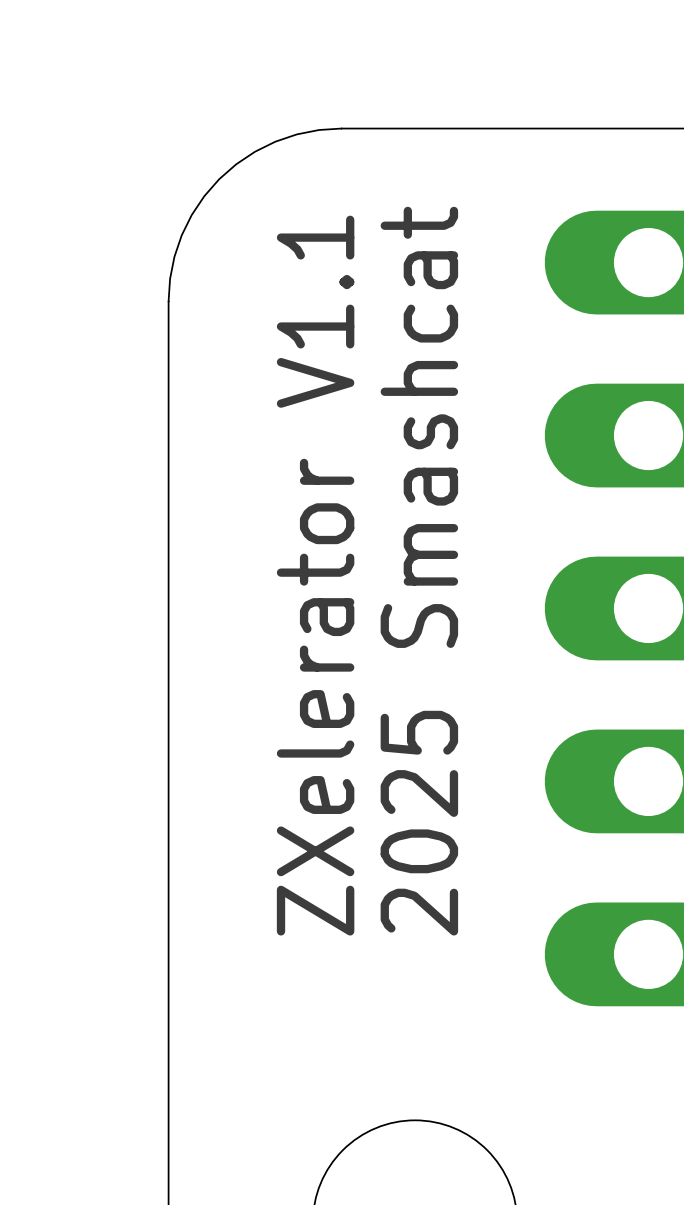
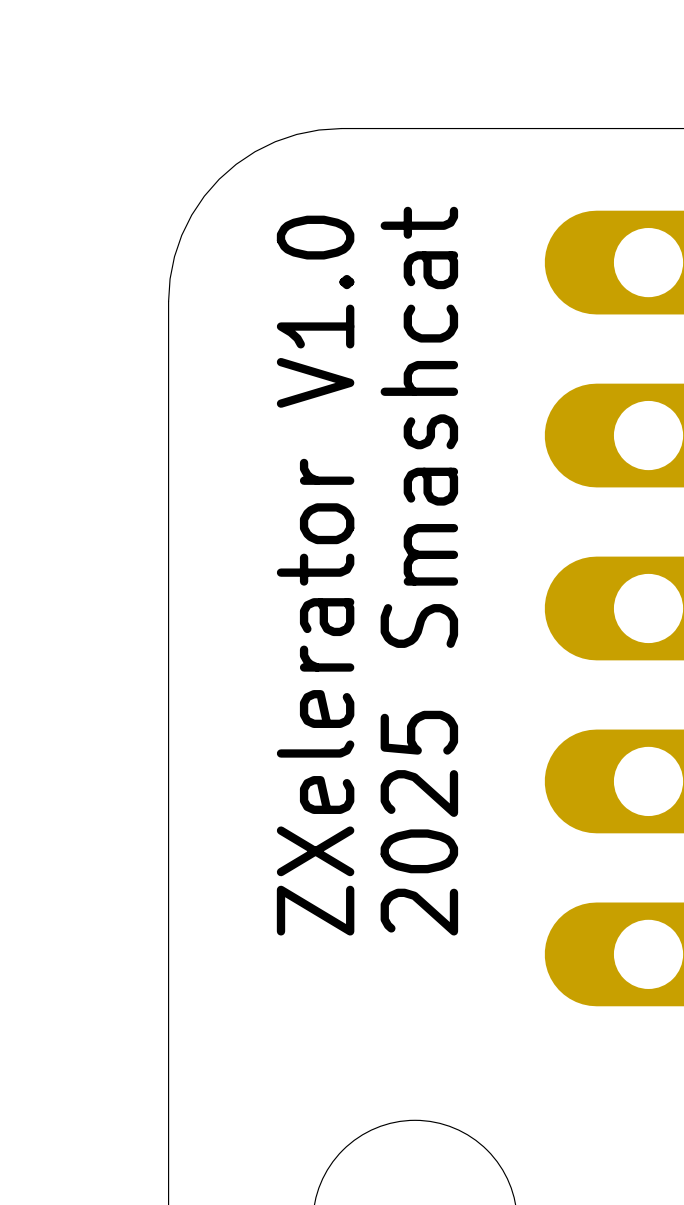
text: ZXelerator V1.1 (315, 575) -> ZXelerator V1.0 (315, 575)

